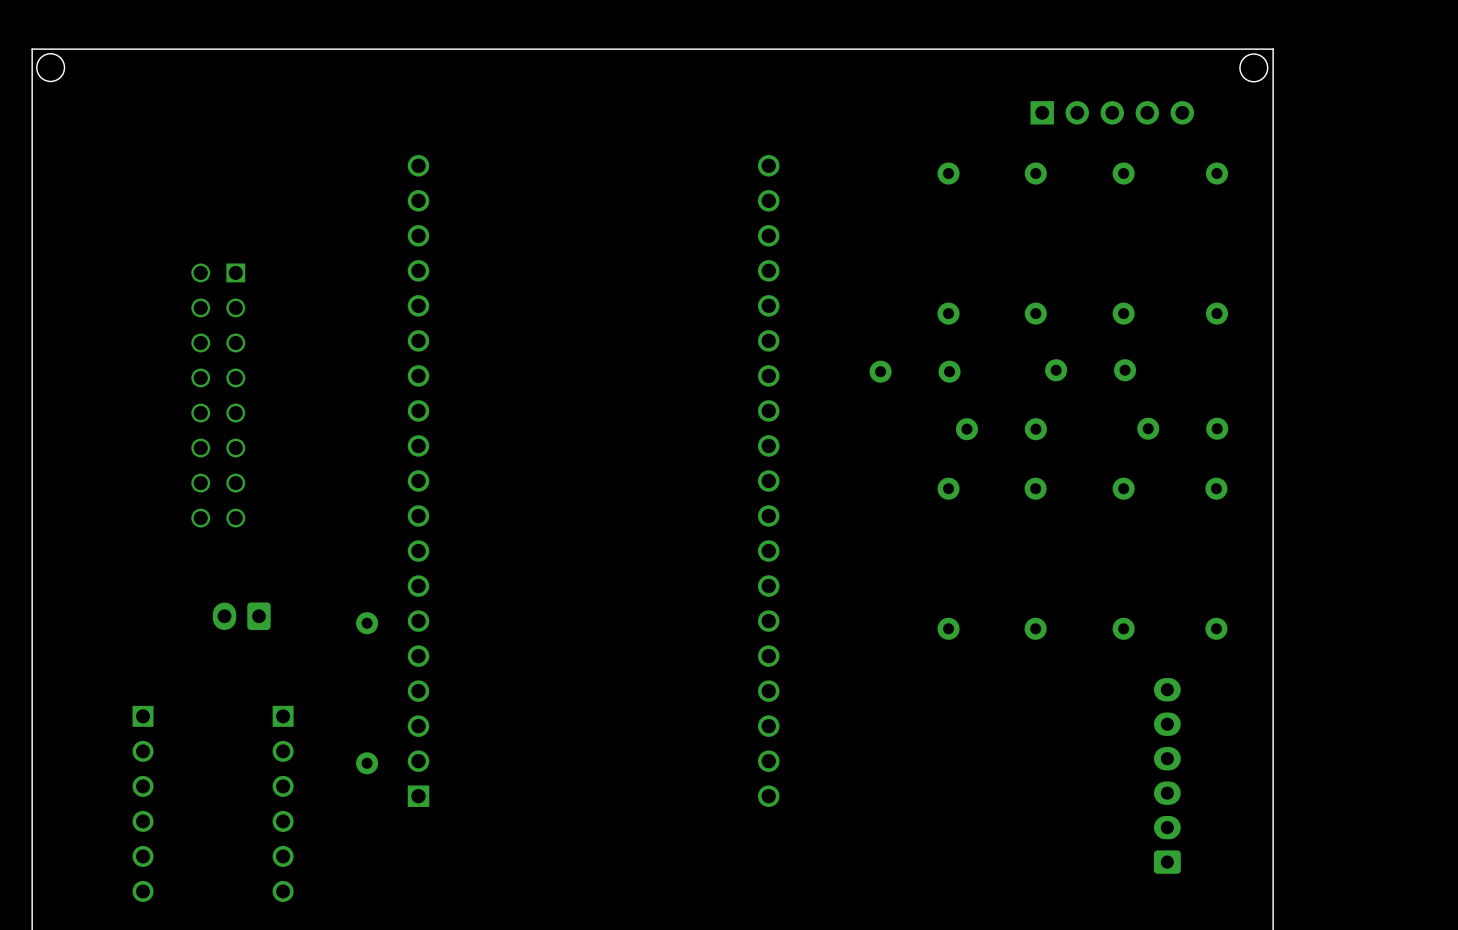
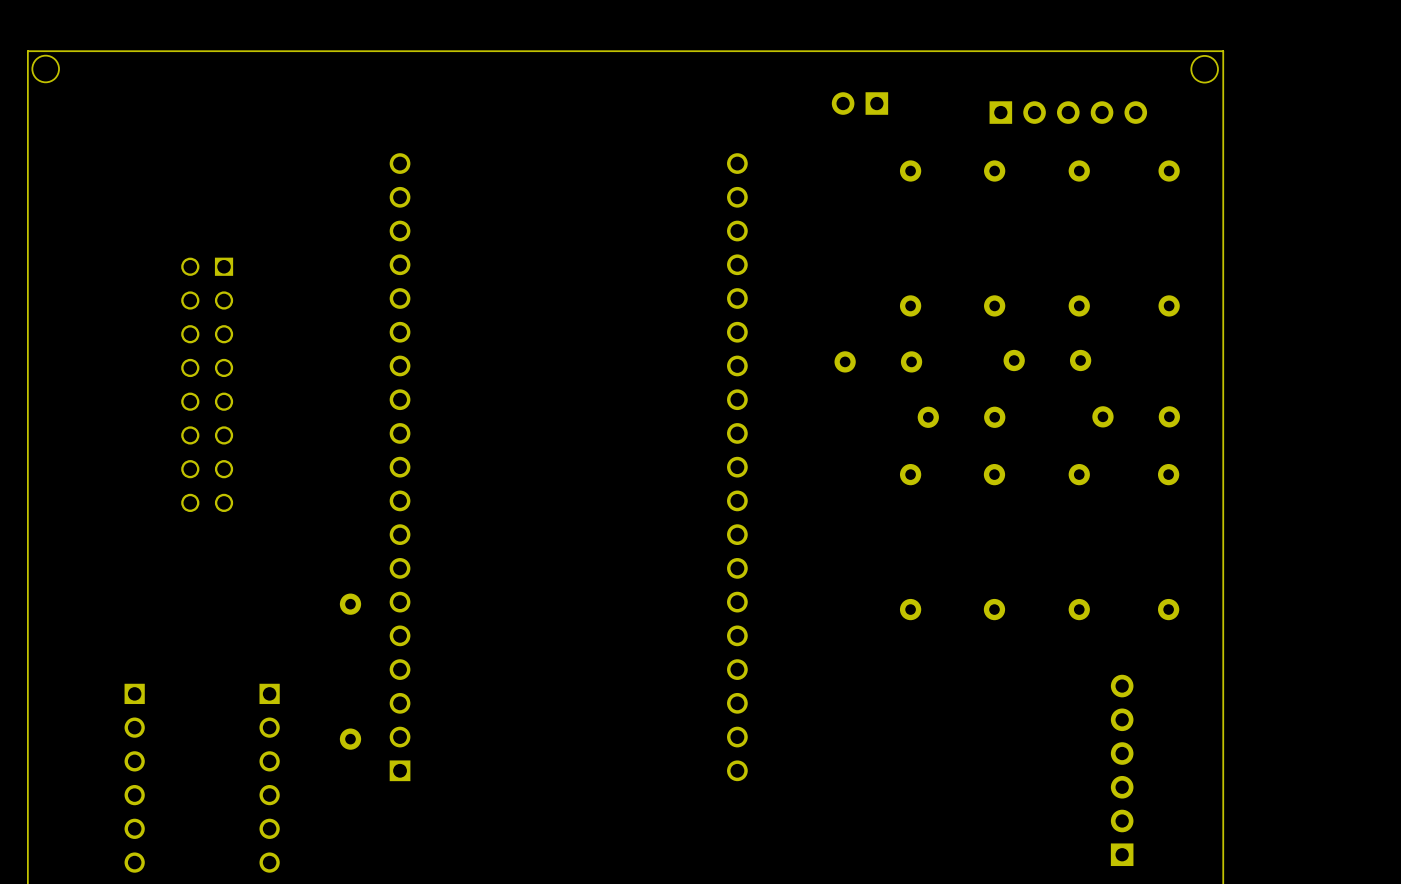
part: none -> (859, 103)
part: (241, 616) -> none
part: (1167, 775) -> none
part: none -> (1122, 770)

